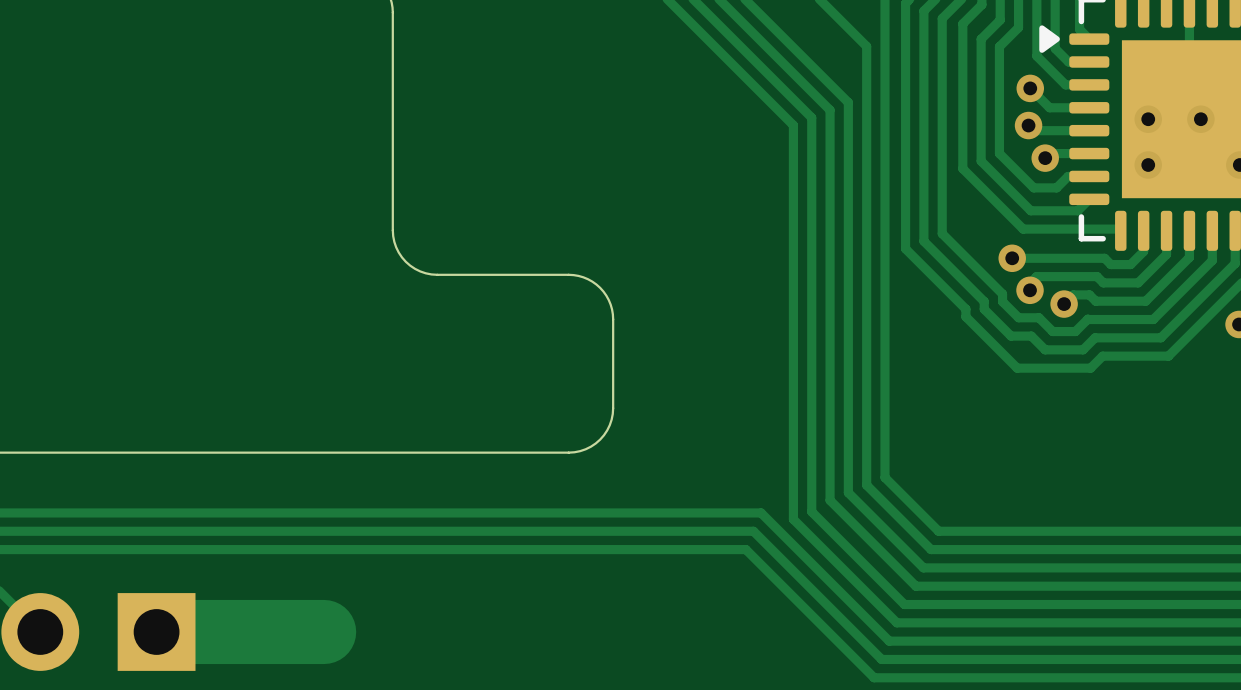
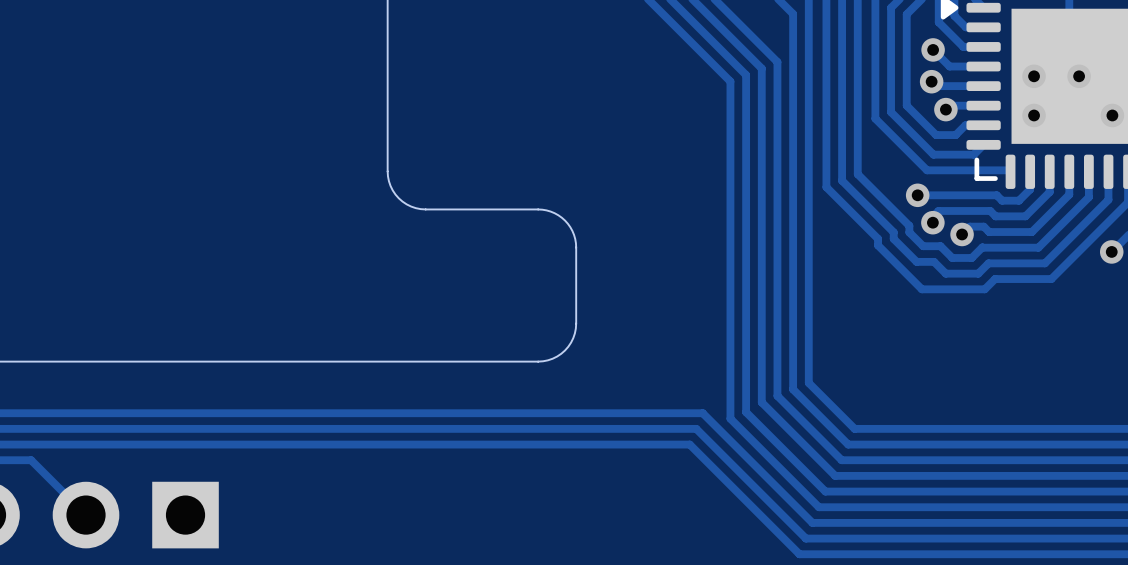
track: (156, 631) (324, 631) -> none

